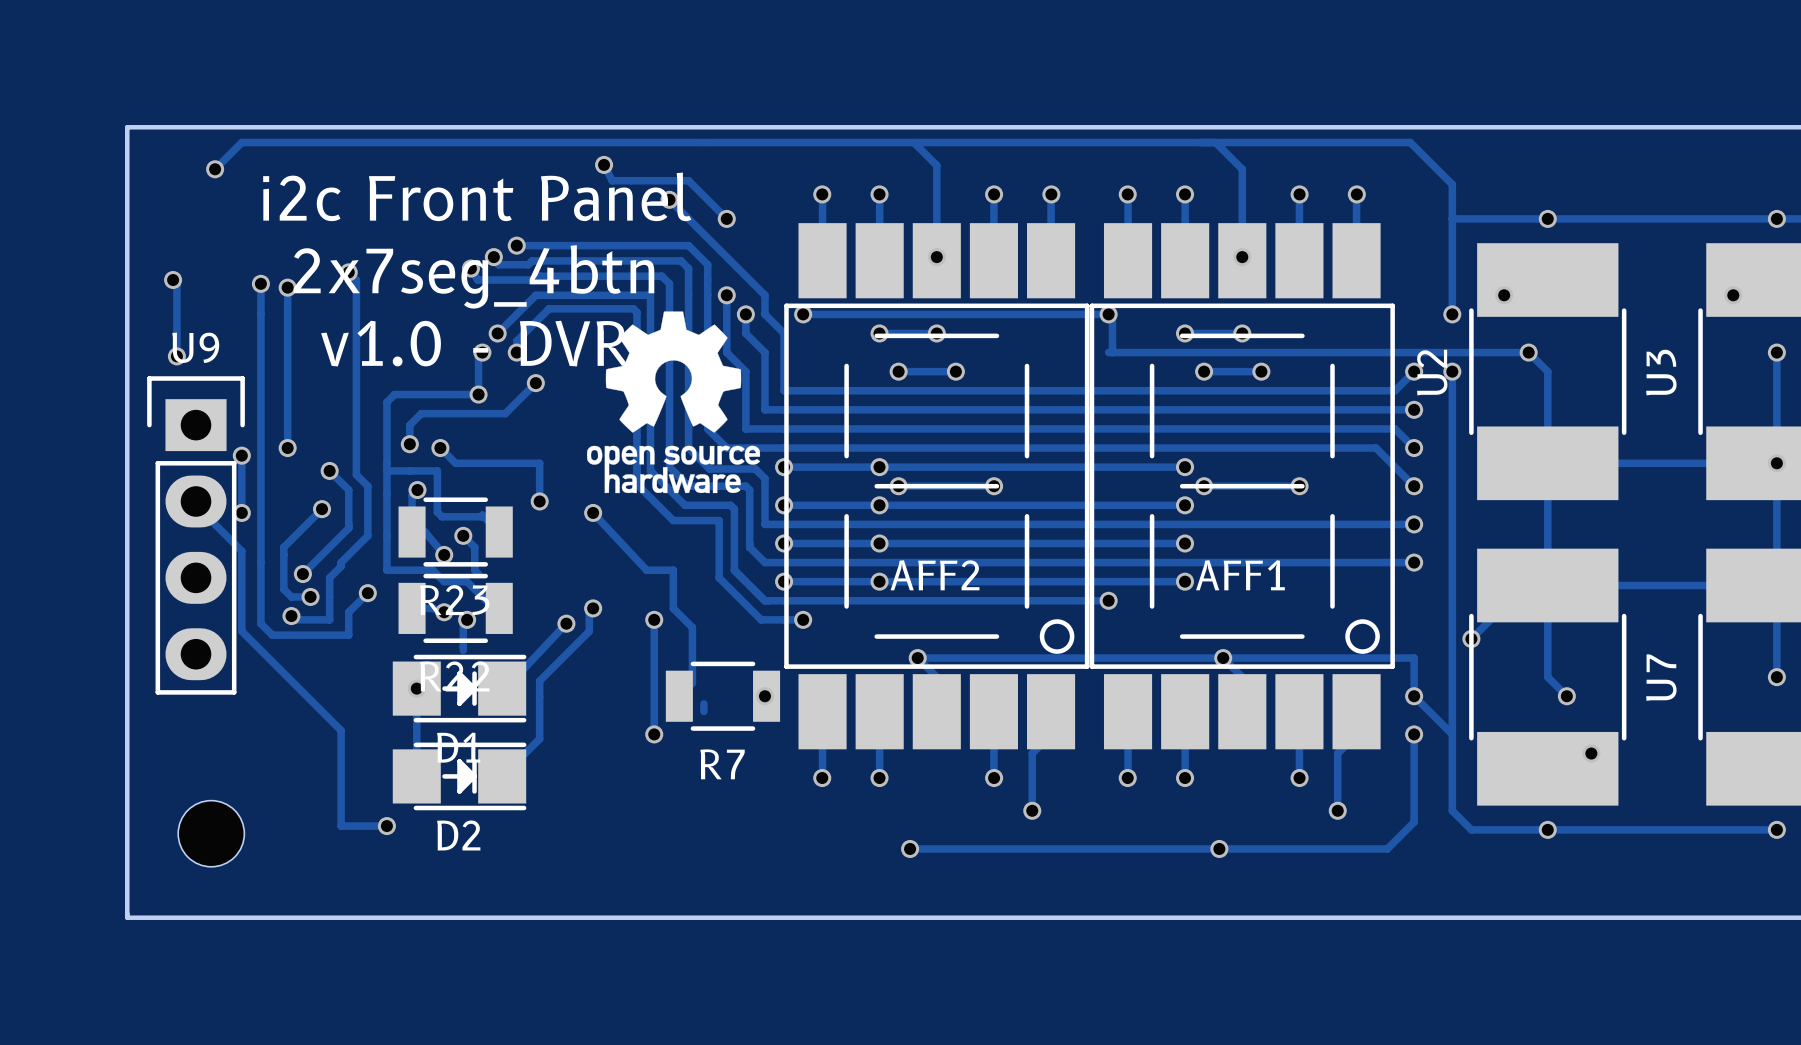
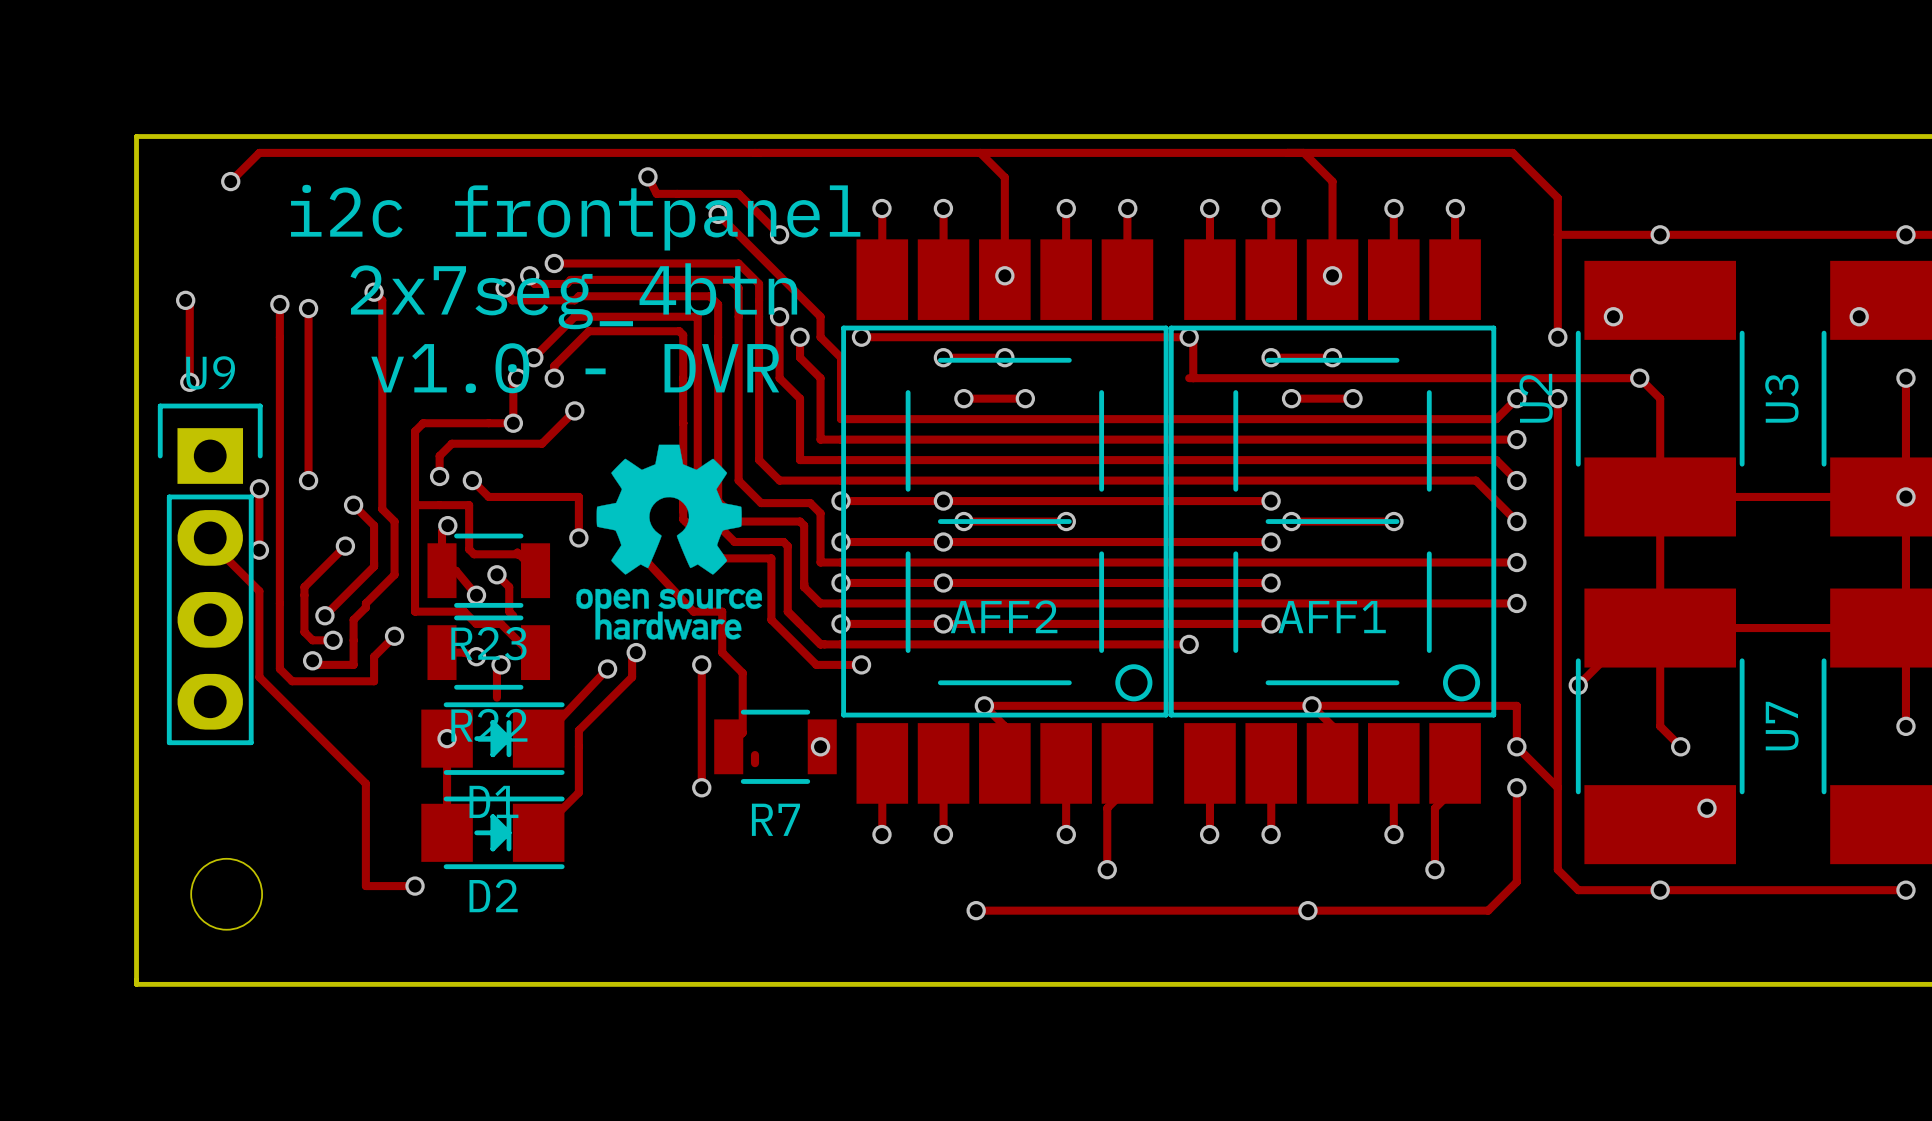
text: i2c Front Panel (477, 196) -> i2c frontpanel (575, 217)
text position: 2x7seg_4btn (474, 276) -> 2x7seg_4btn (573, 296)
text position: v1.0 - DVR (474, 343) -> v1.0 - DVR (575, 368)
drawing position: (673, 402) -> (669, 542)

